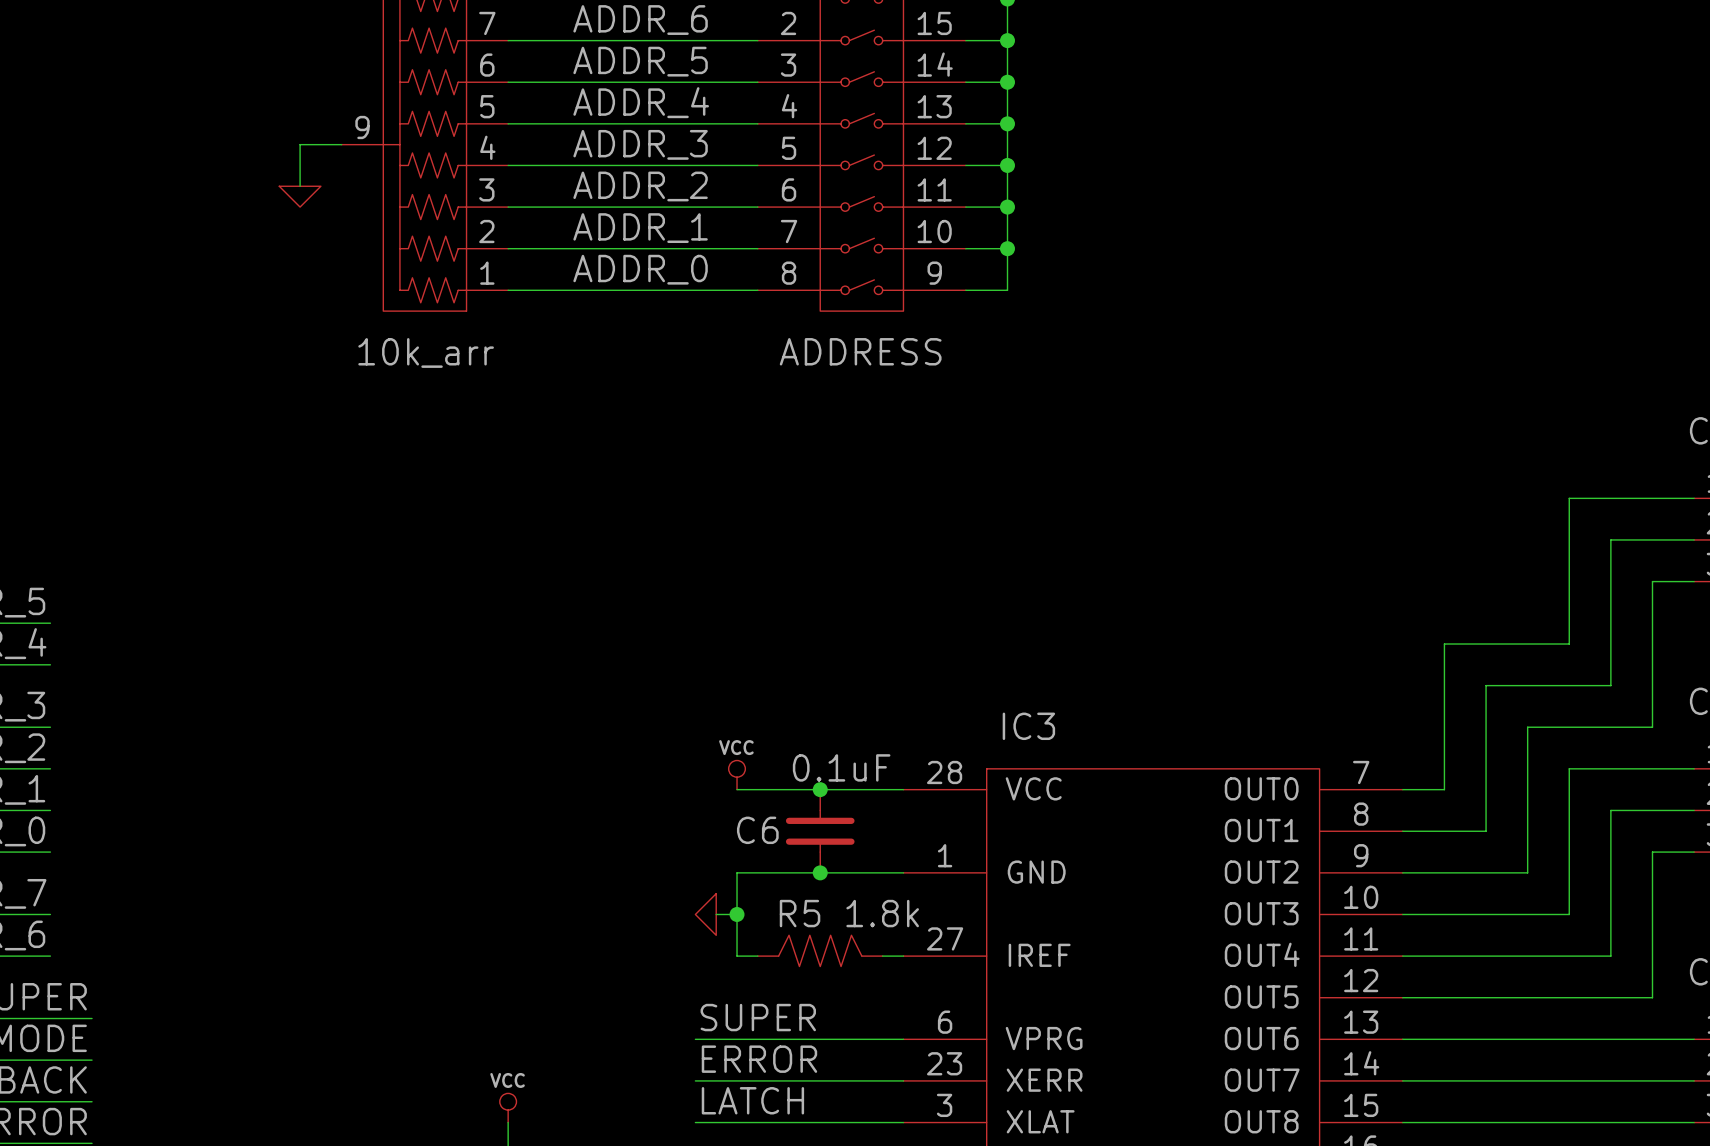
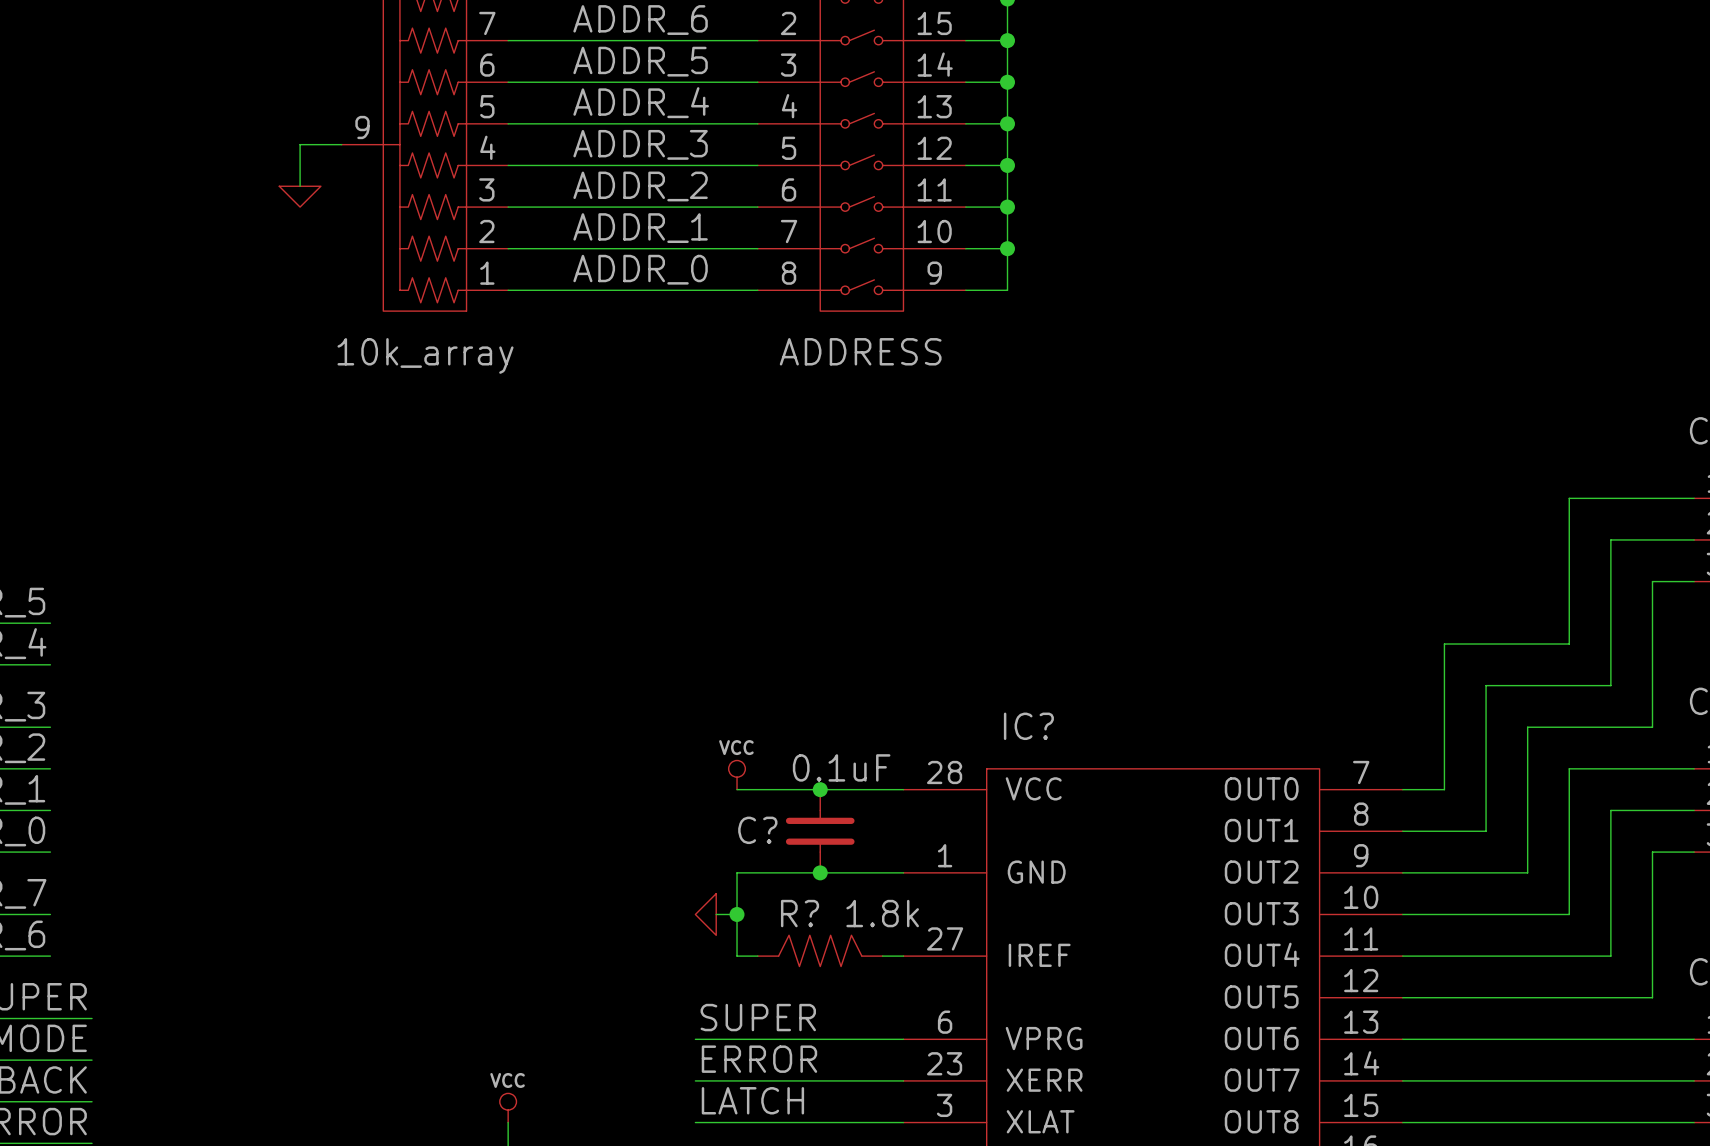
part value: 10k_arr (426, 352) -> 10k_array (425, 355)
IC3 name: IC3 (1028, 726) -> IC? (1028, 726)
C6 name: C6 (757, 830) -> C? (757, 830)
R5 name: R5 (800, 913) -> R? (800, 913)

